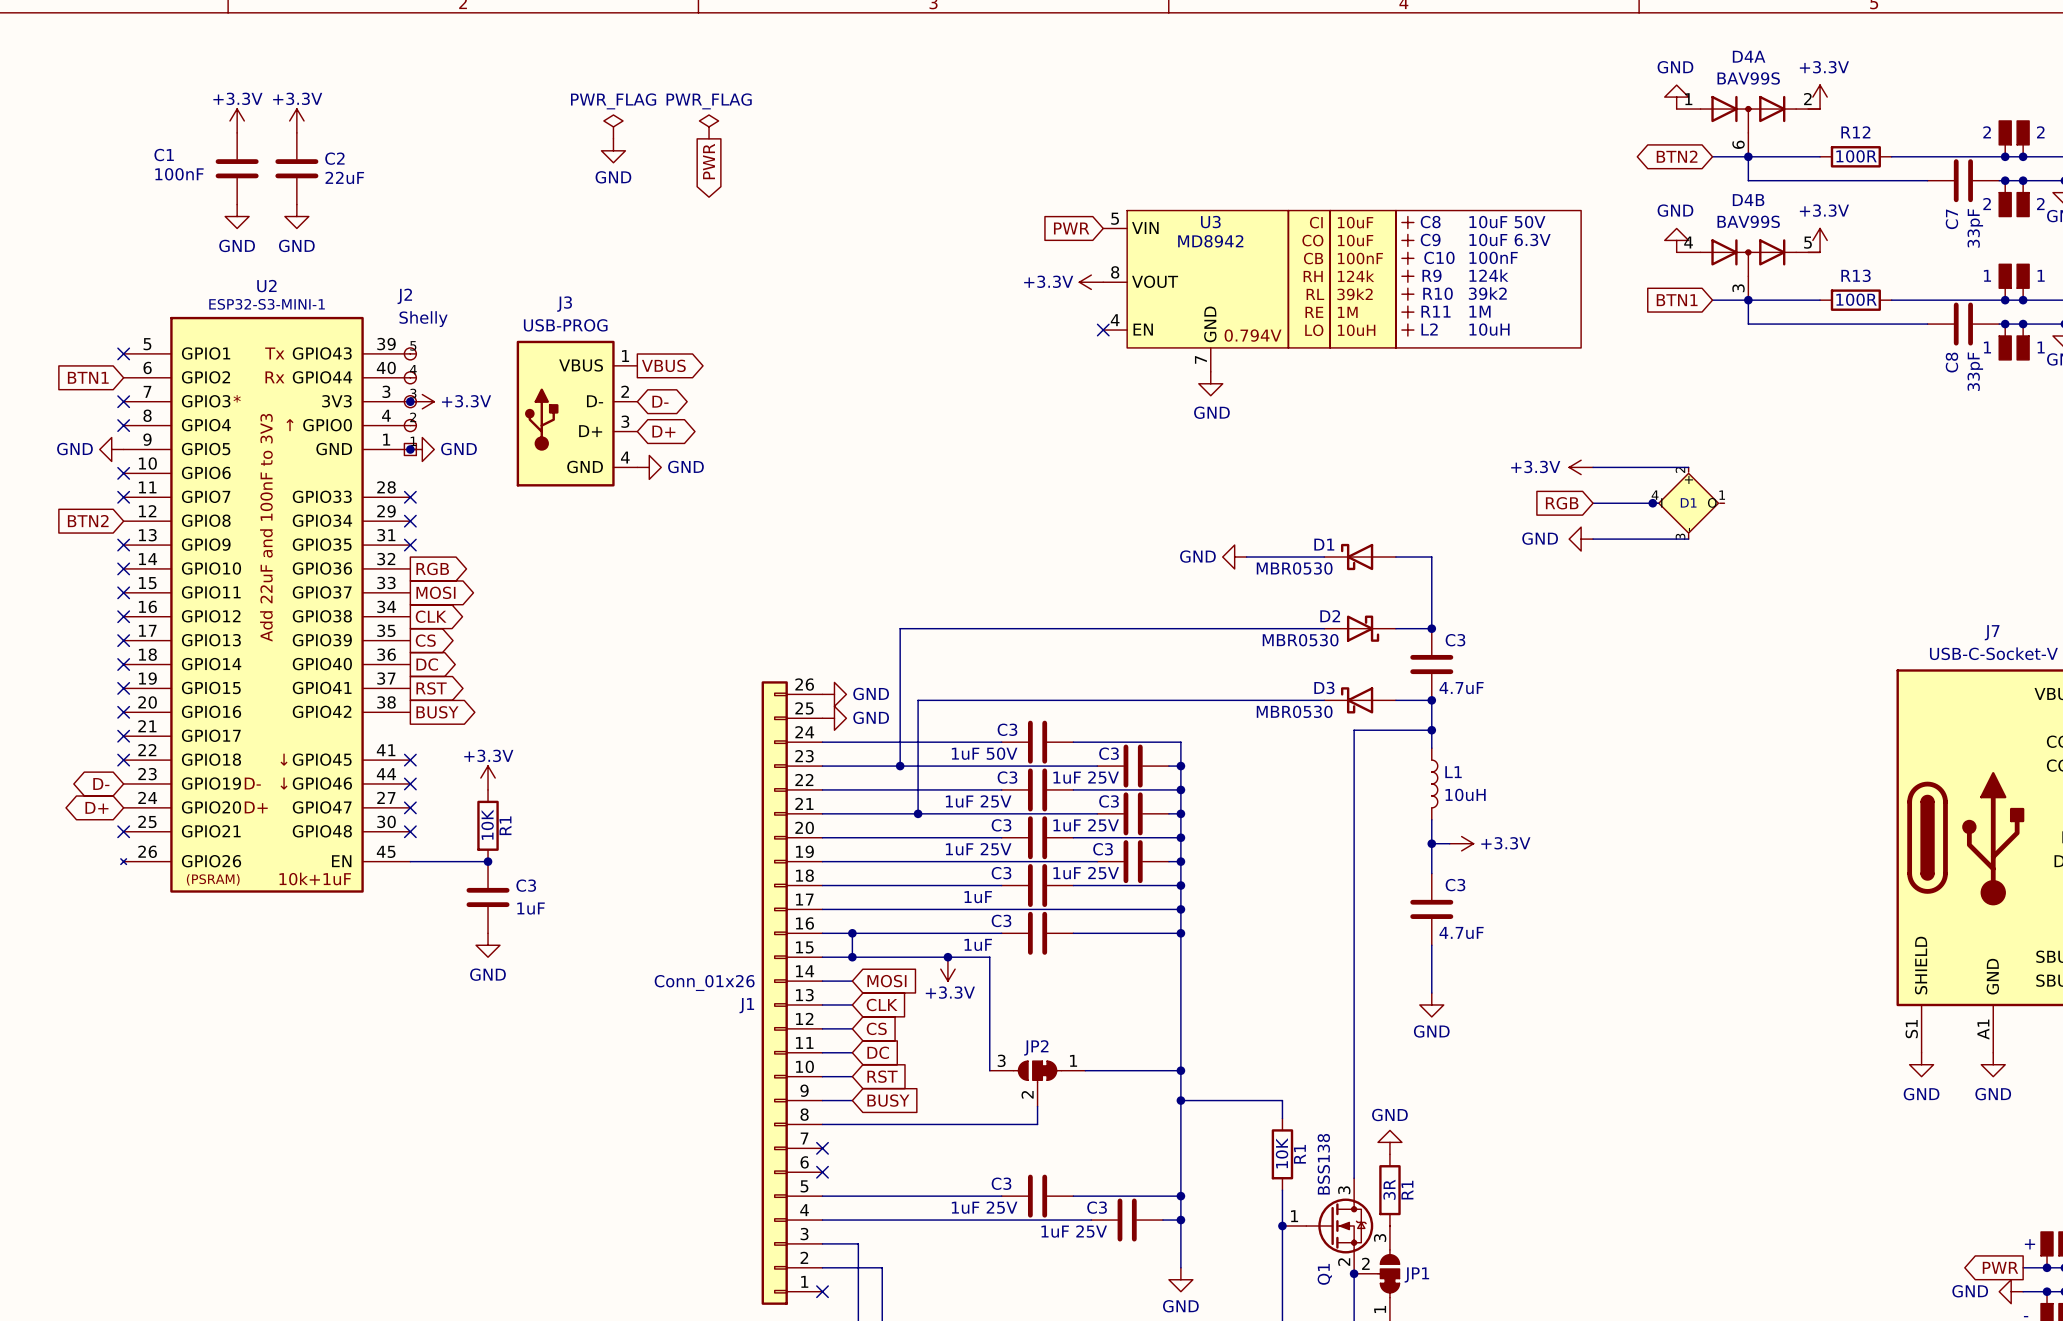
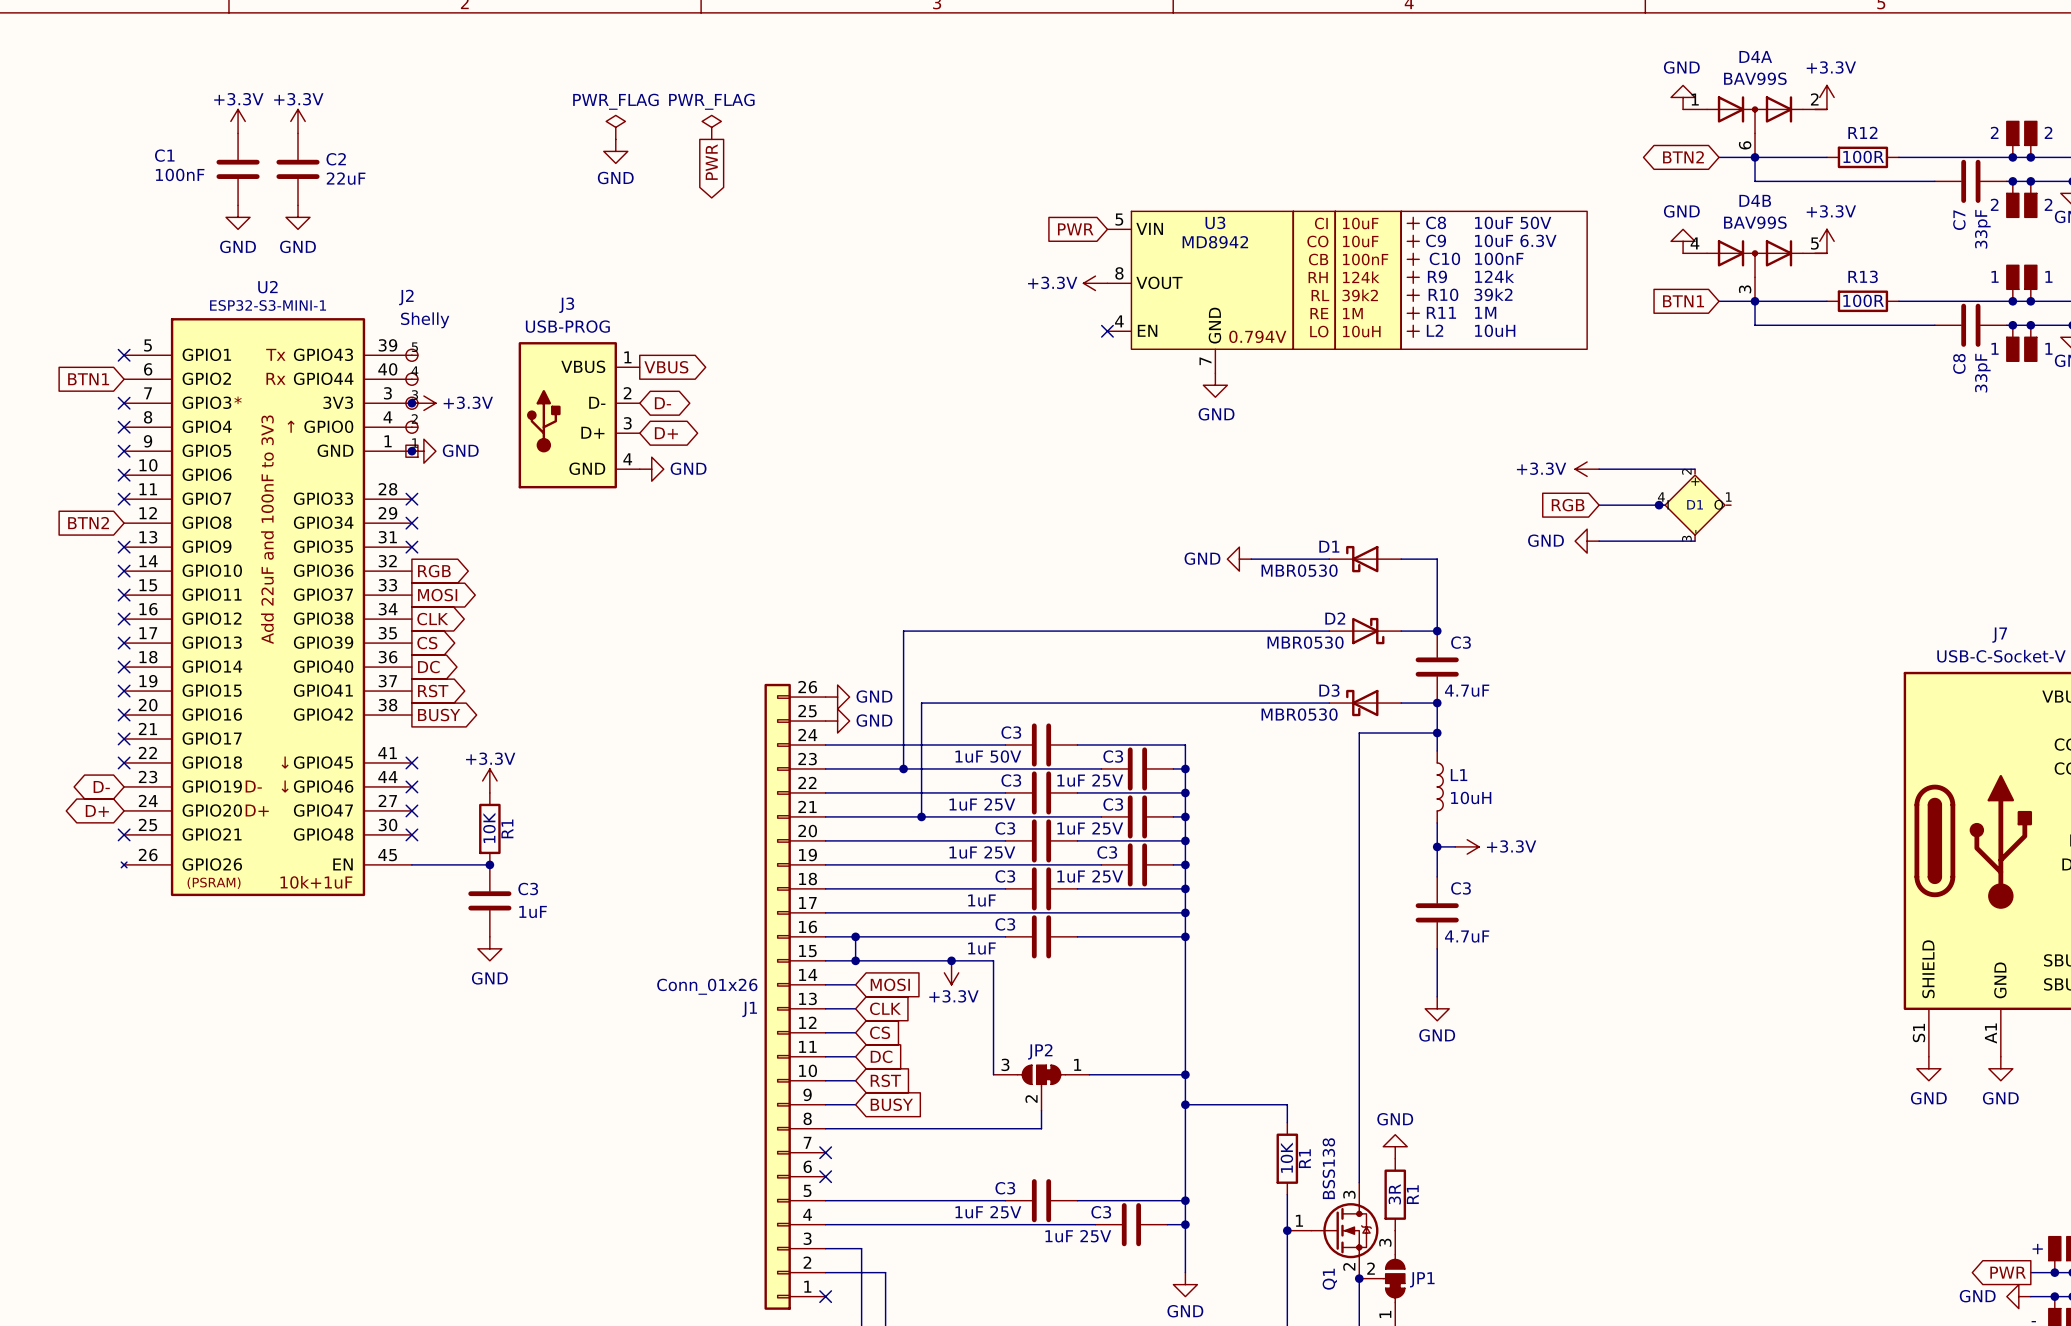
power symbol: GND (111, 449) -> none
no-connect mark: none -> (124, 451)

